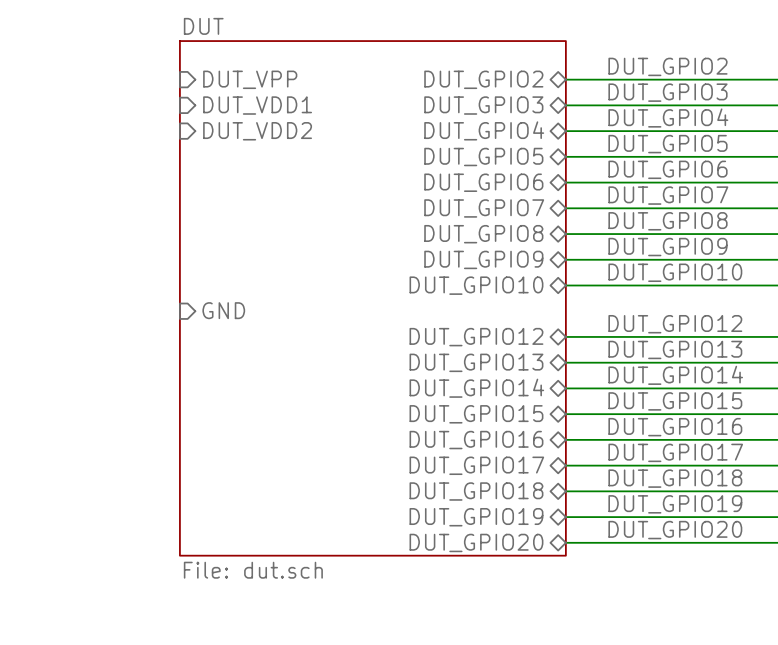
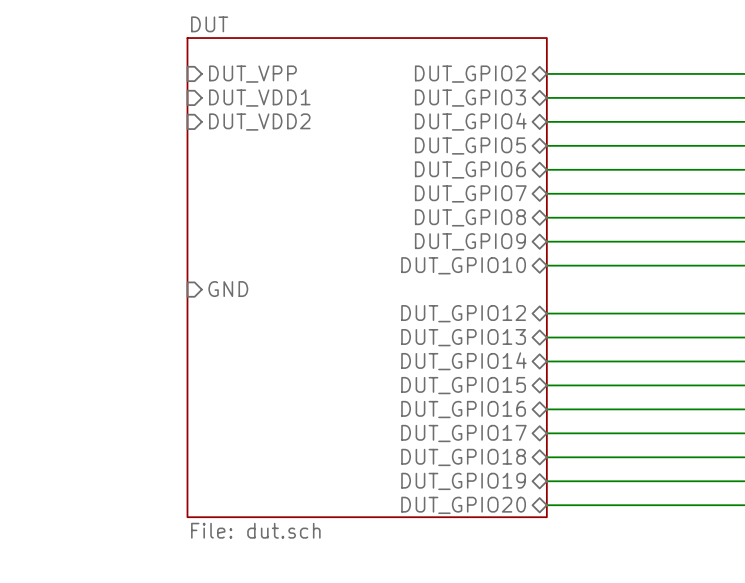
label: DUT_GPIO2 (668, 66) -> none
label: DUT_GPIO3 (668, 92) -> none
label: DUT_GPIO4 (668, 118) -> none
label: DUT_GPIO5 (668, 144) -> none
label: DUT_GPIO6 (668, 169) -> none
label: DUT_GPIO7 (668, 195) -> none
label: DUT_GPIO8 (668, 221) -> none
label: DUT_GPIO9 (668, 247) -> none
label: DUT_GPIO10 (675, 272) -> none
label: DUT_GPIO12 (675, 324) -> none
label: DUT_GPIO13 (675, 349) -> none
label: DUT_GPIO14 (675, 375) -> none
label: DUT_GPIO15 (675, 401) -> none
label: DUT_GPIO16 (675, 427) -> none
label: DUT_GPIO17 (675, 452) -> none
label: DUT_GPIO18 (675, 478) -> none
label: DUT_GPIO19 (675, 504) -> none
label: DUT_GPIO20 (675, 530) -> none

